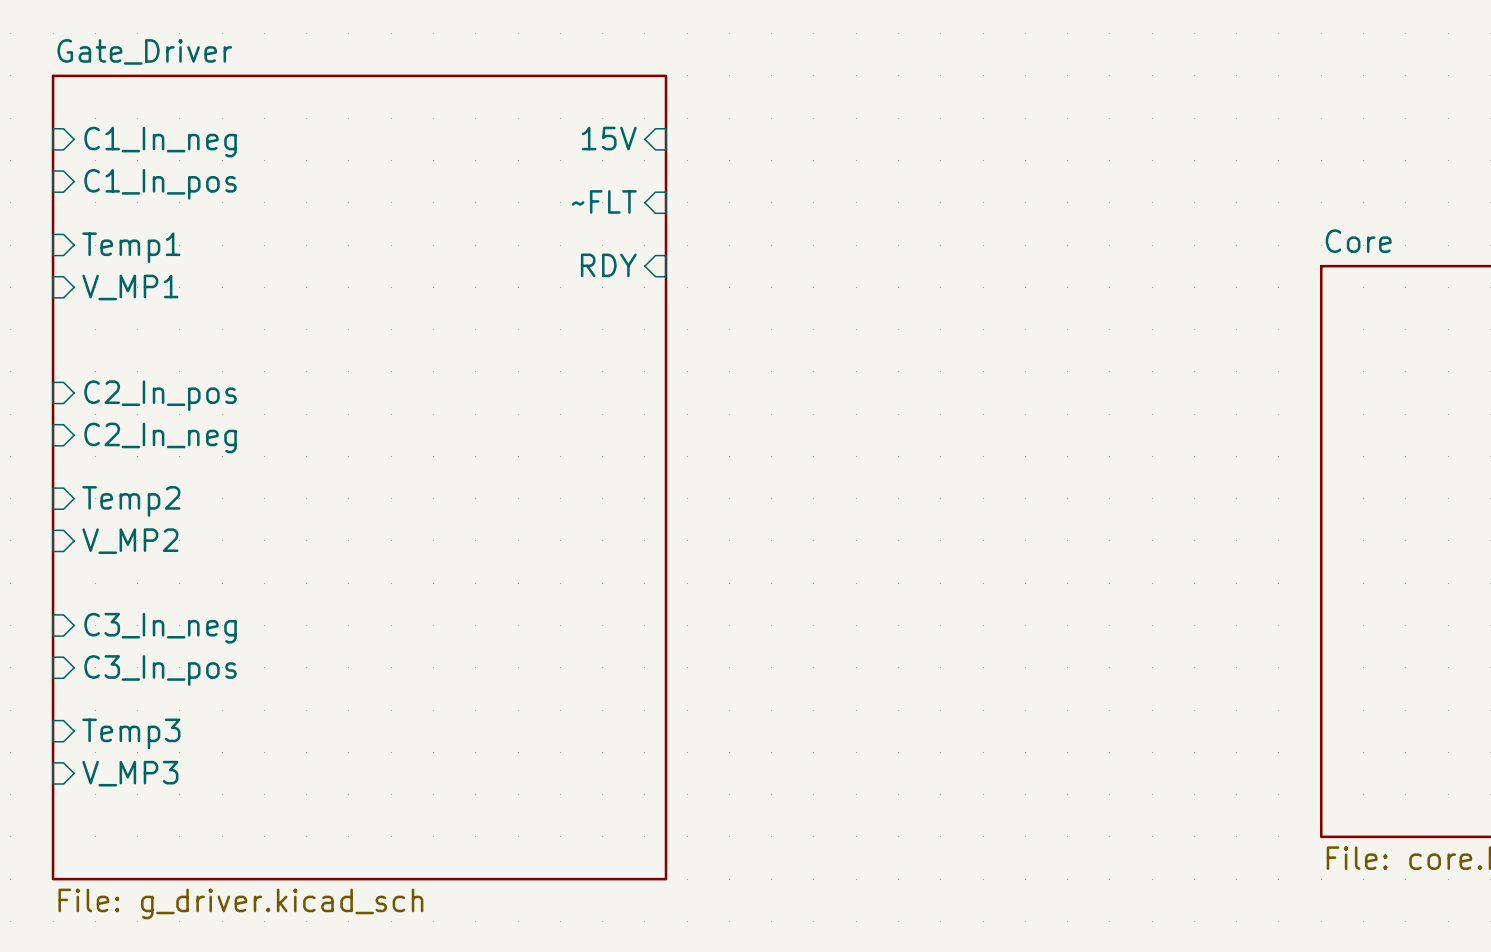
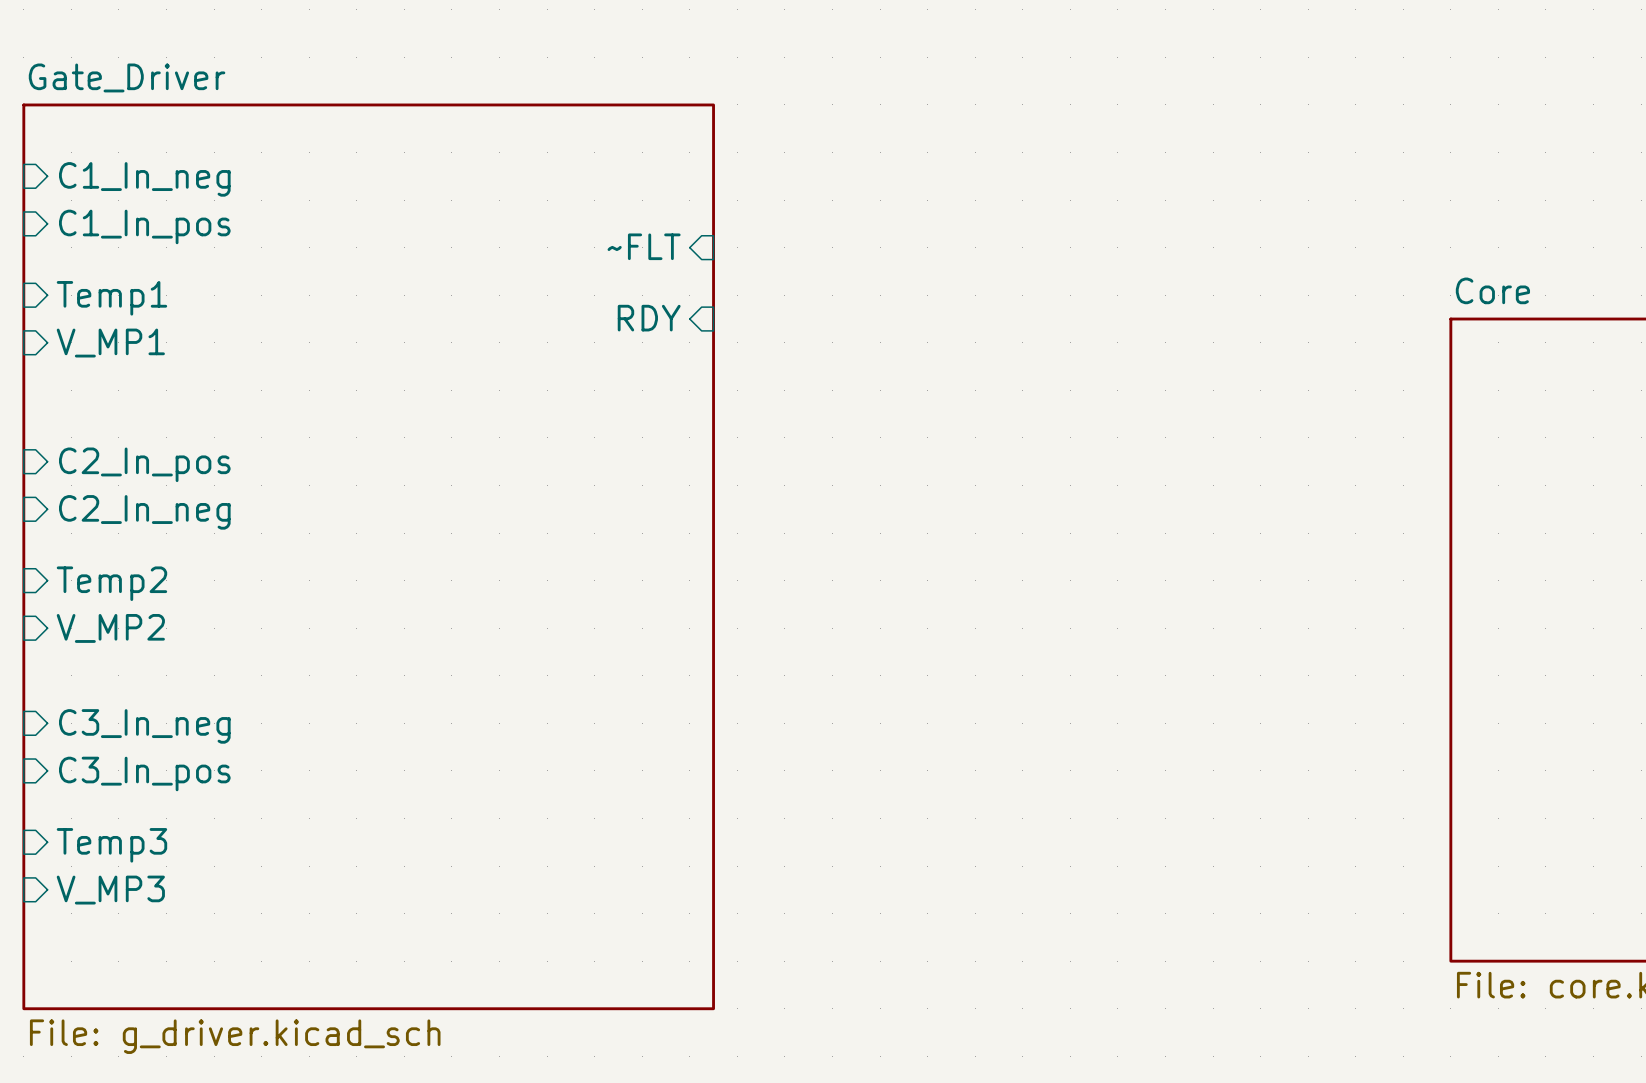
sheet pin: 15V (609, 138) -> none

